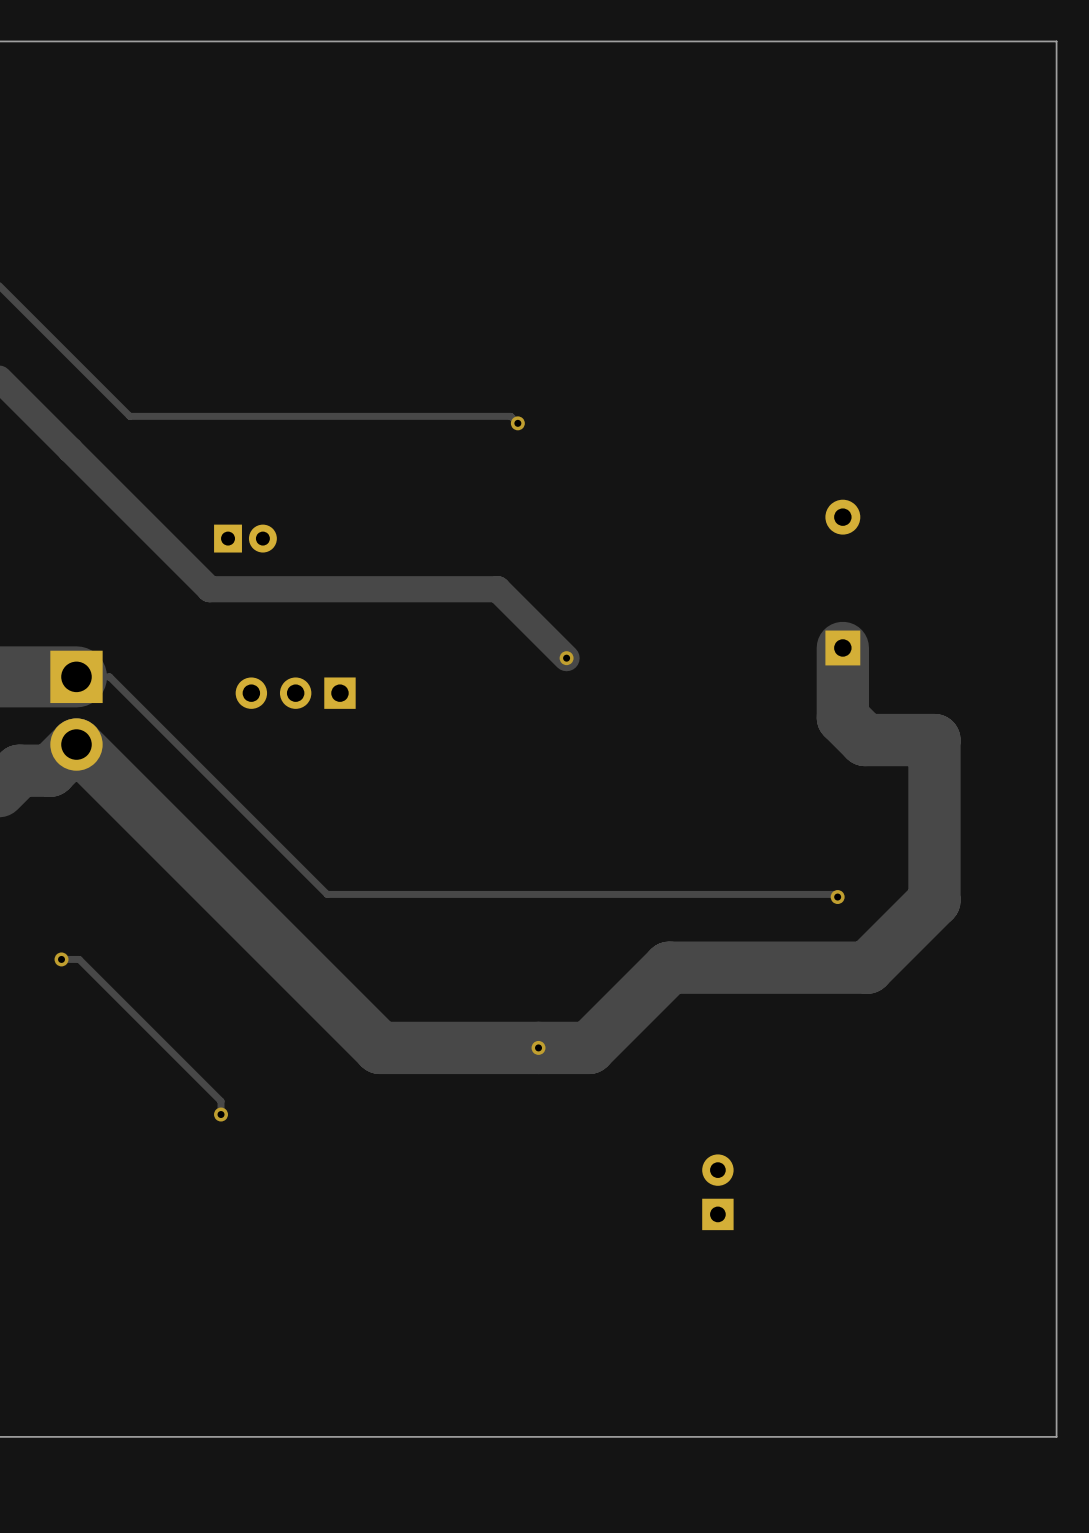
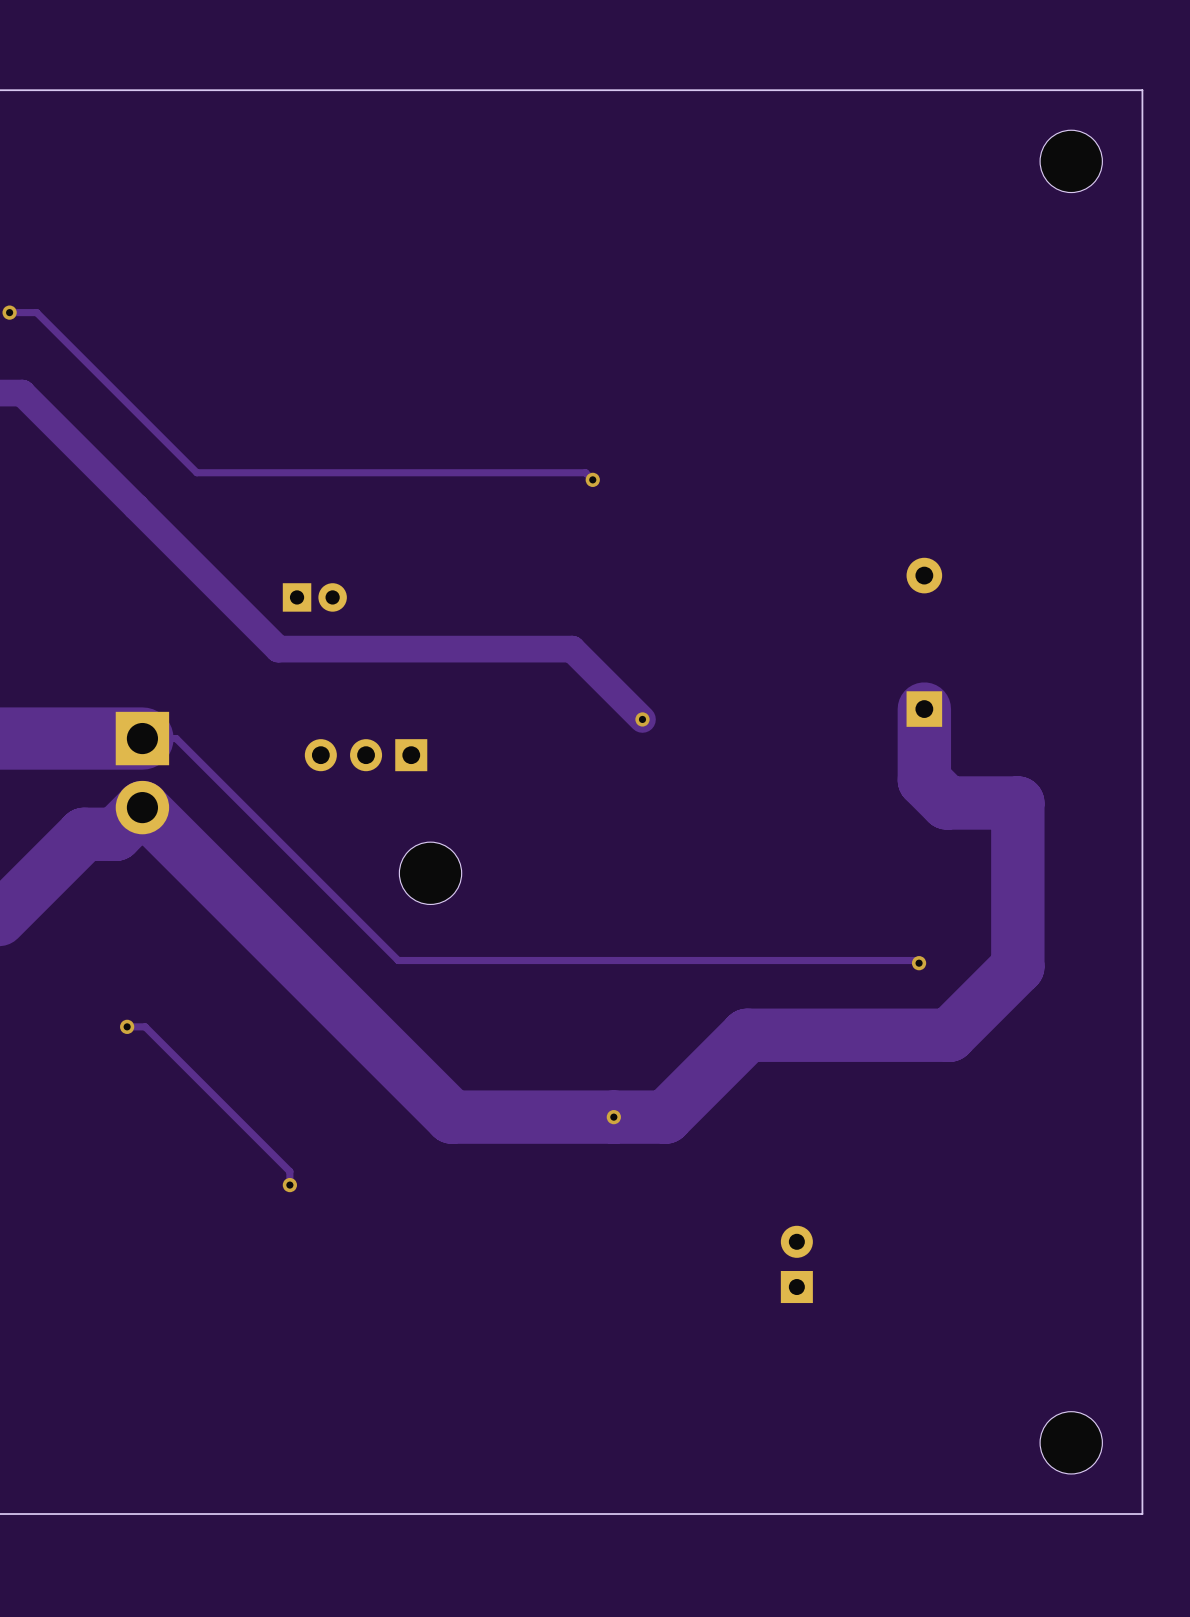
part: none -> (1071, 161)
part: none -> (430, 873)
part: none -> (1071, 1442)

